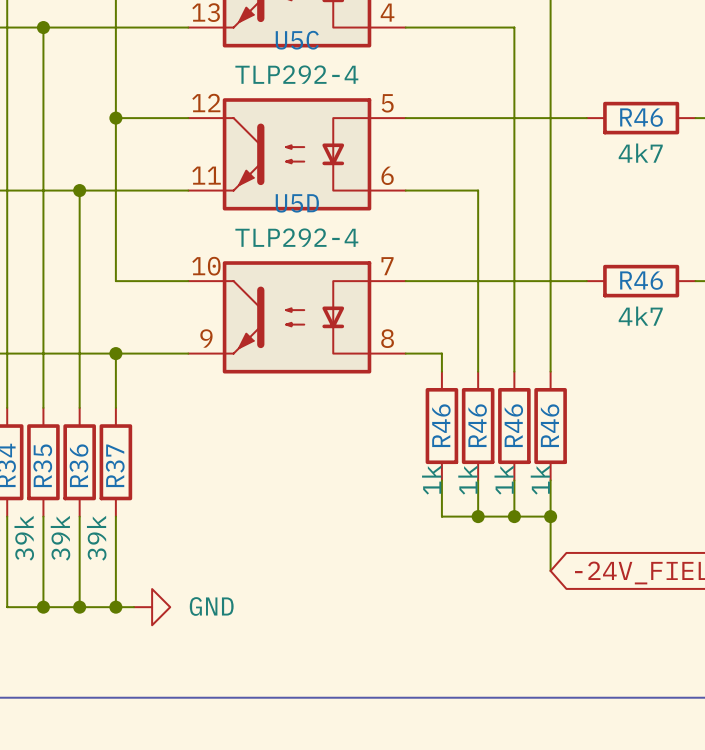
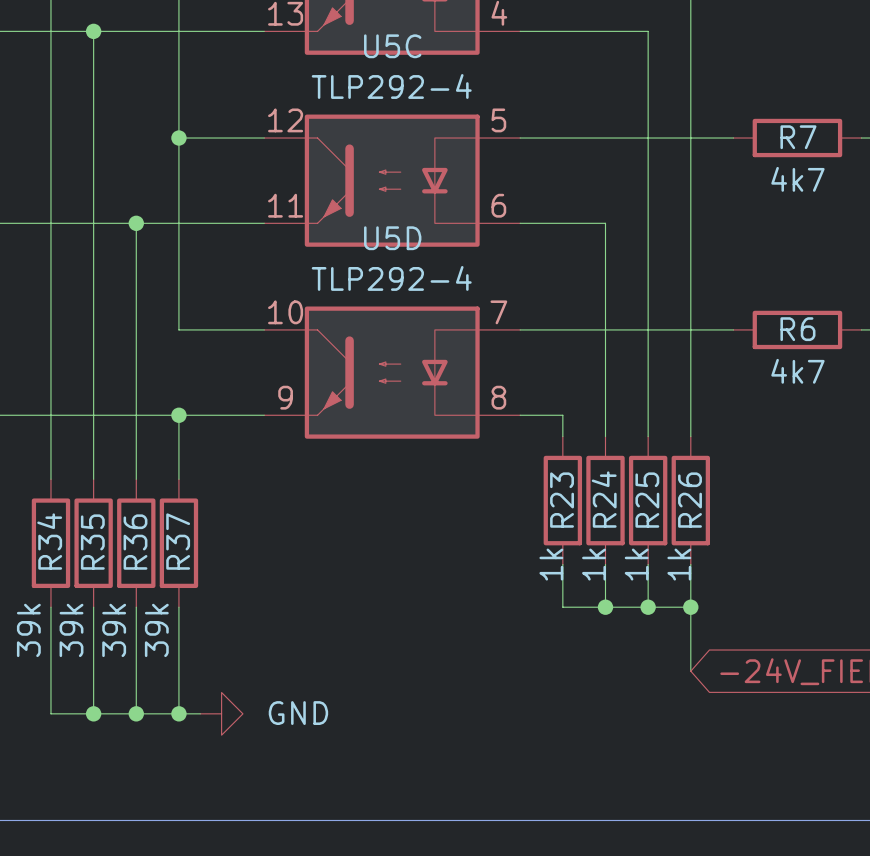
R46 name: R46 (641, 117) -> R7 (798, 137)
R46 name: R46 (641, 280) -> R6 (797, 329)
R46 name: R46 (441, 425) -> R23 (562, 500)
R46 name: R46 (477, 425) -> R24 (604, 499)
R46 name: R46 (513, 425) -> R25 (647, 500)
R46 name: R46 (550, 425) -> R26 (690, 500)

